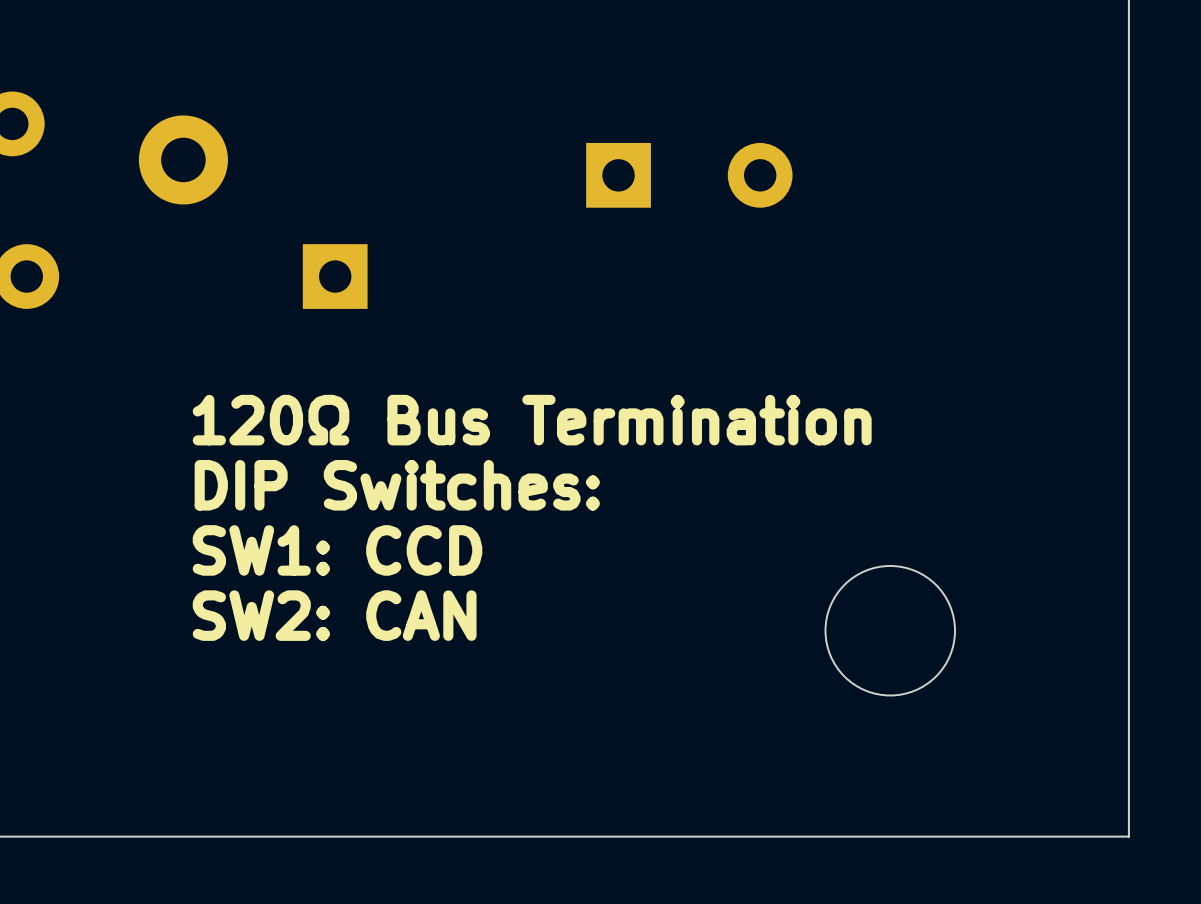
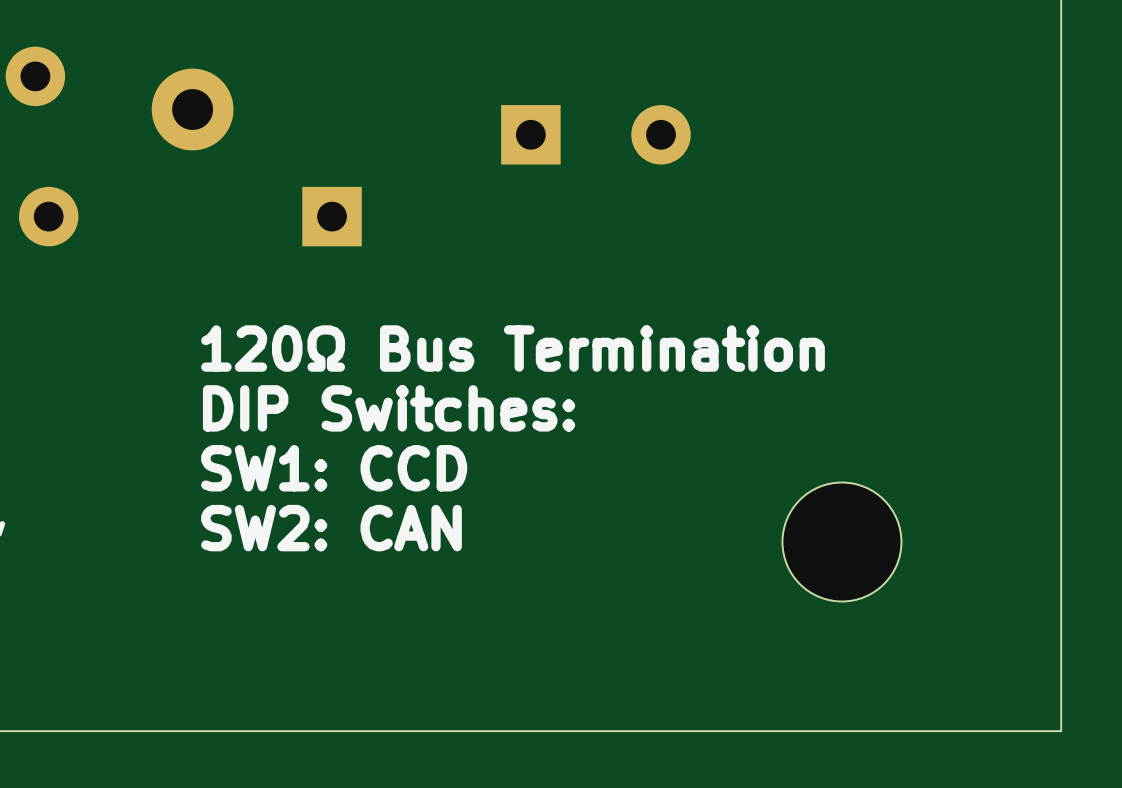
part position: (689, 175) -> (595, 134)

